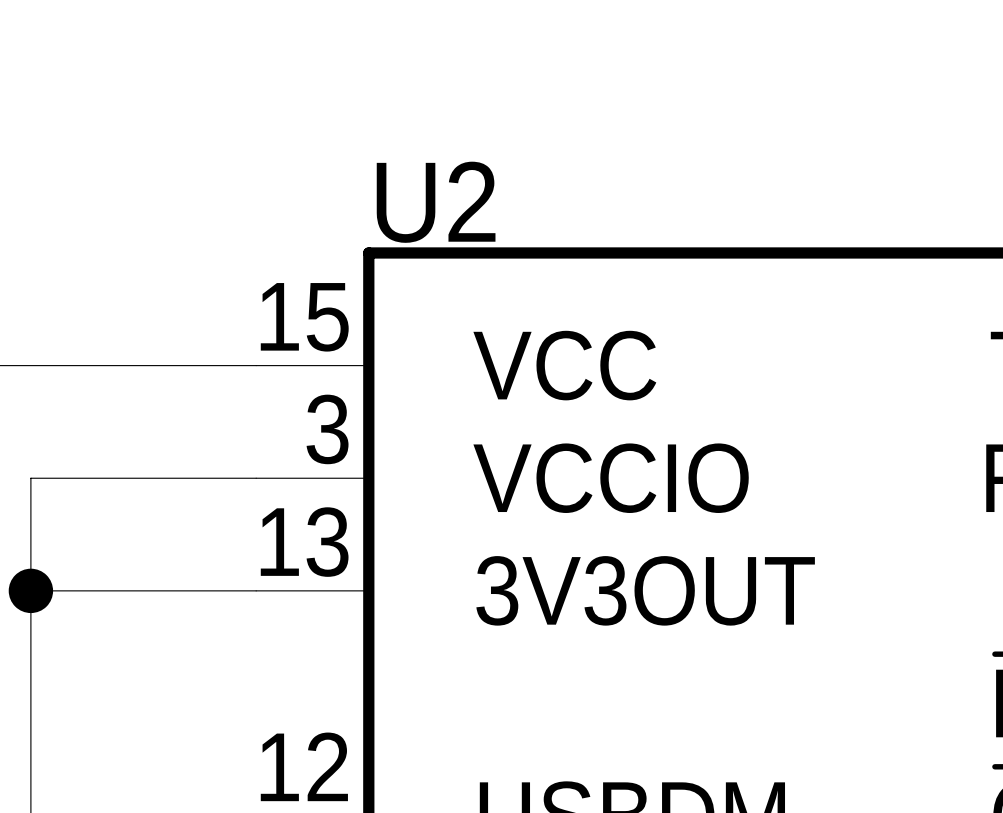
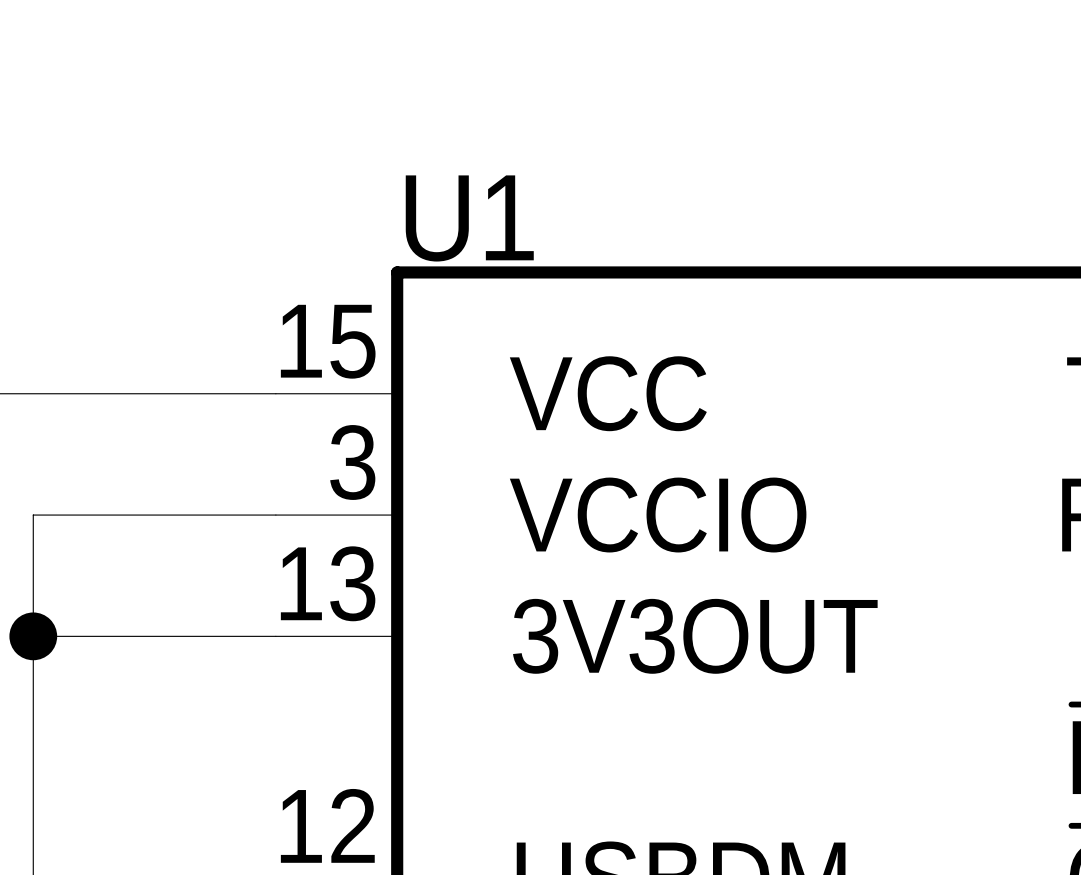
U2 name: U2 (436, 202) -> U1 (469, 218)

